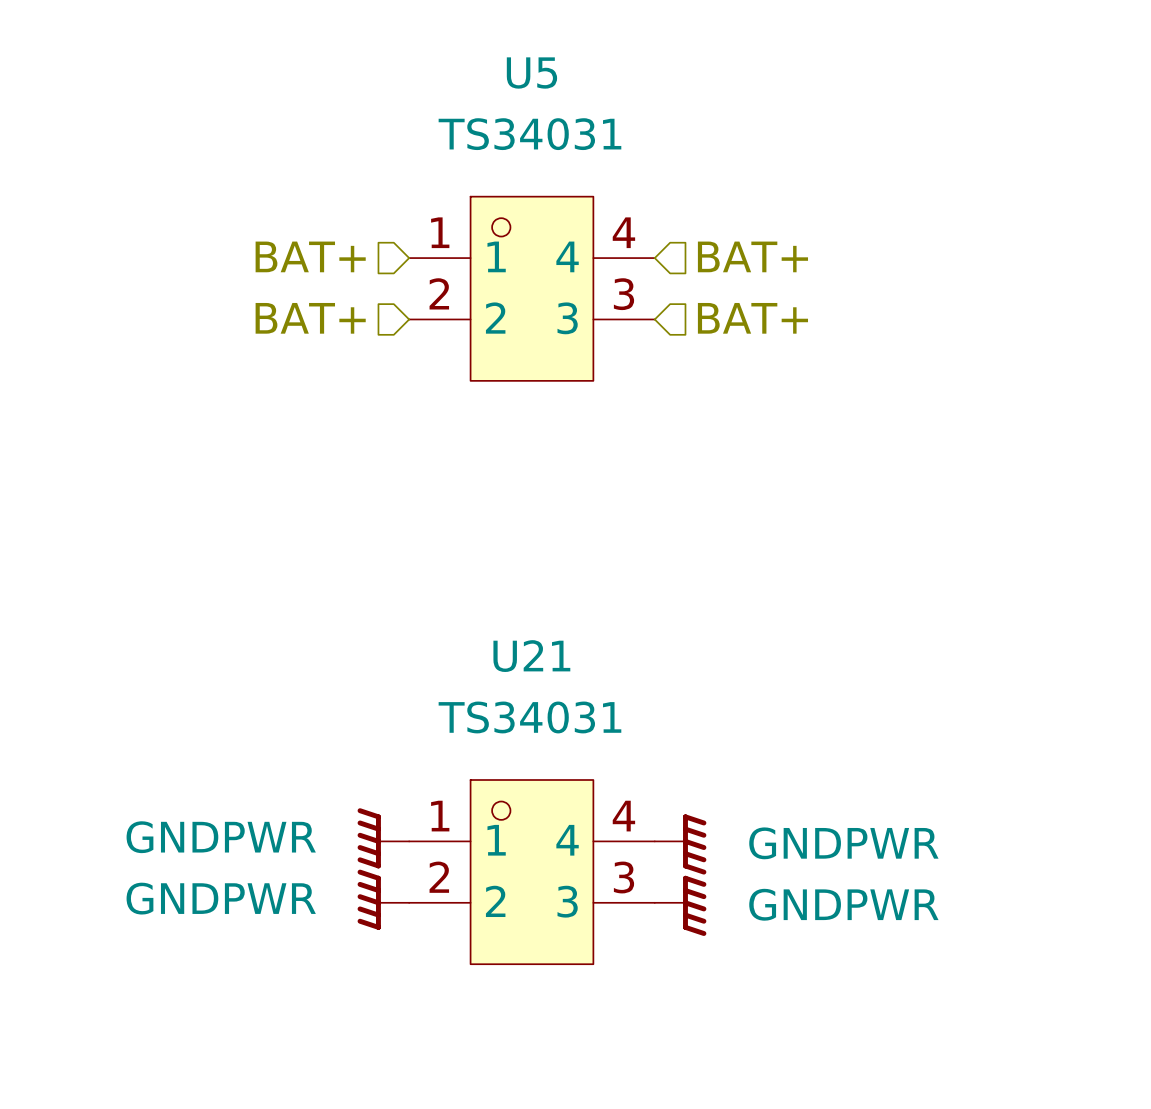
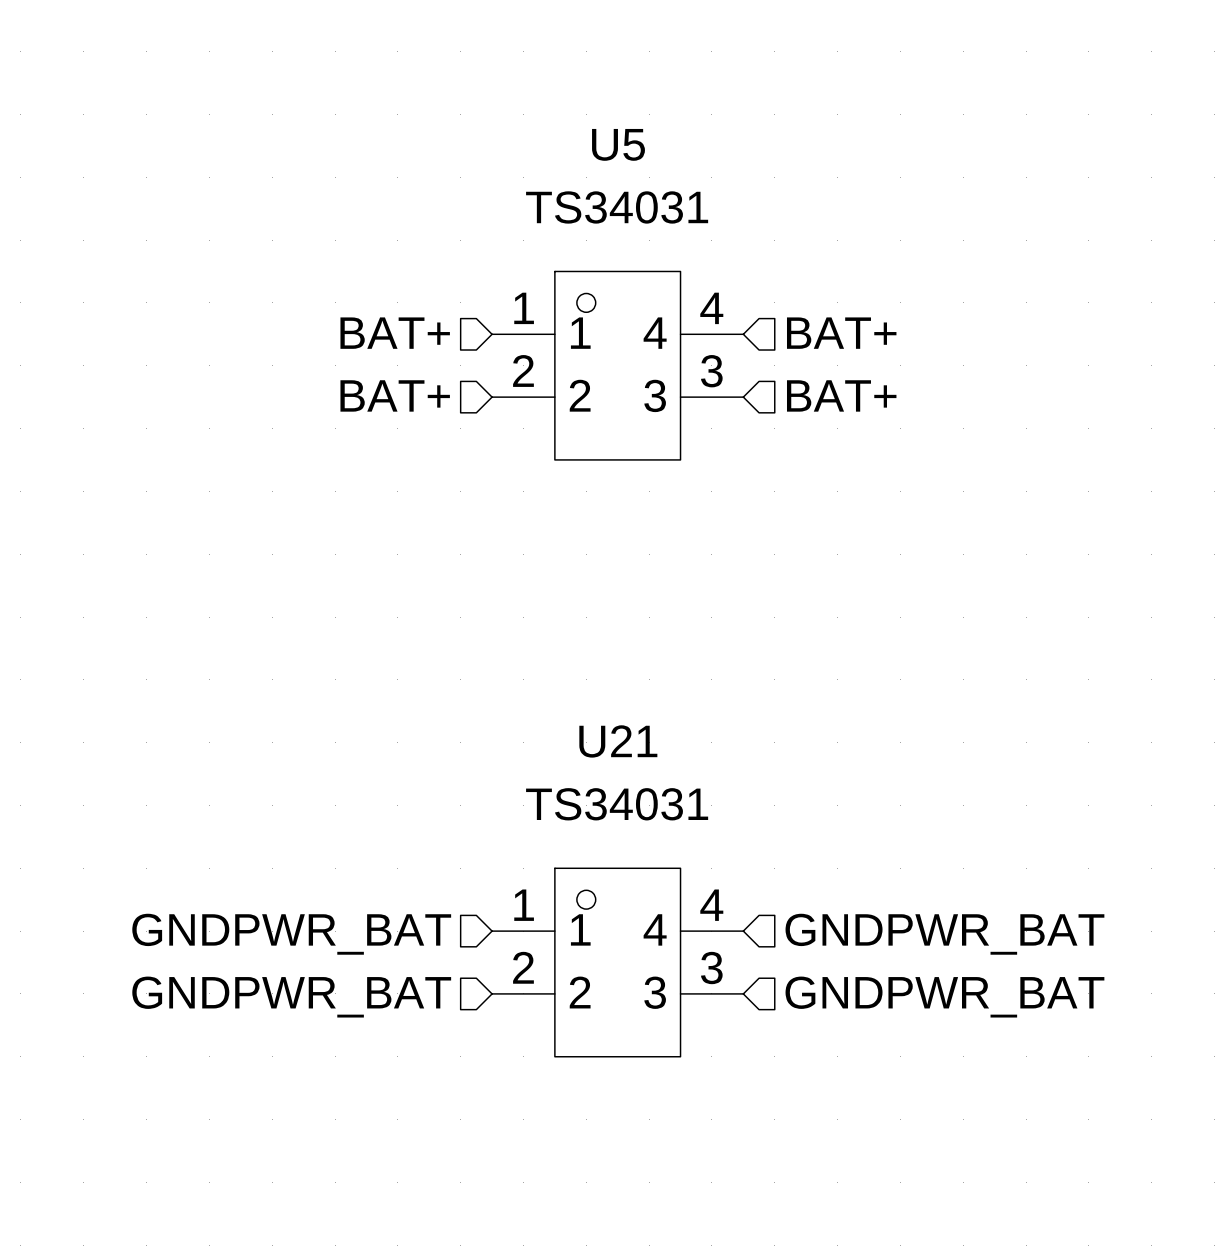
power symbol: GNDPWR (383, 838) -> none
hierarchical label: none -> GNDPWR_BAT (291, 934)
power symbol: GNDPWR (680, 844) -> none
hierarchical label: none -> GNDPWR_BAT (944, 934)
power symbol: GNDPWR (383, 899) -> none
power symbol: GNDPWR (680, 905) -> none
hierarchical label: none -> GNDPWR_BAT (291, 997)
hierarchical label: none -> GNDPWR_BAT (944, 997)

